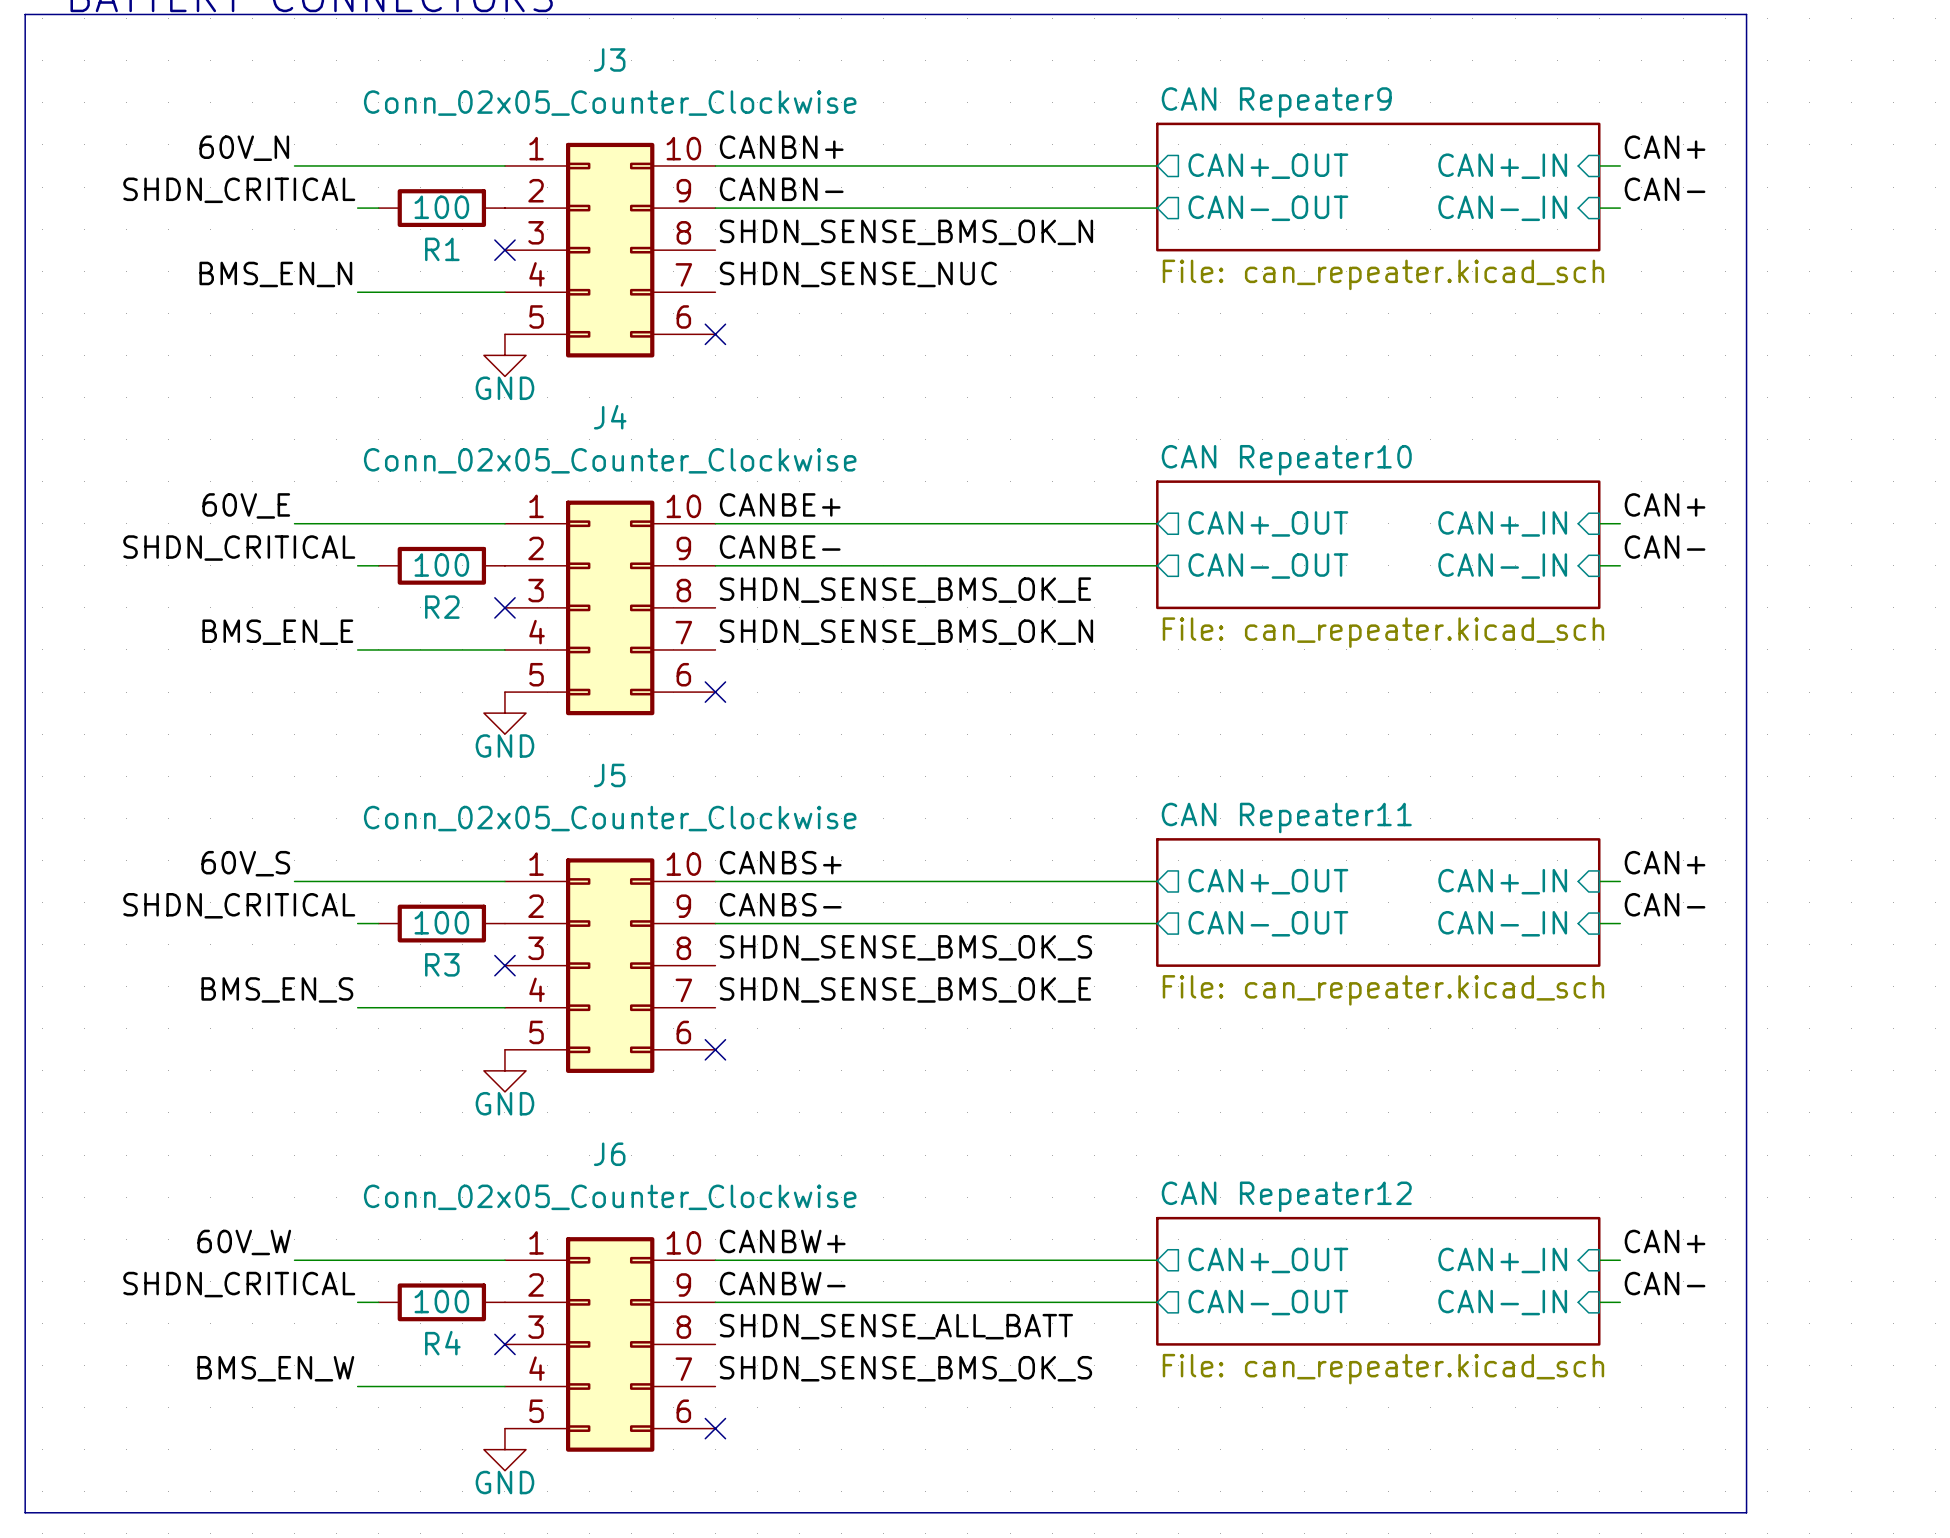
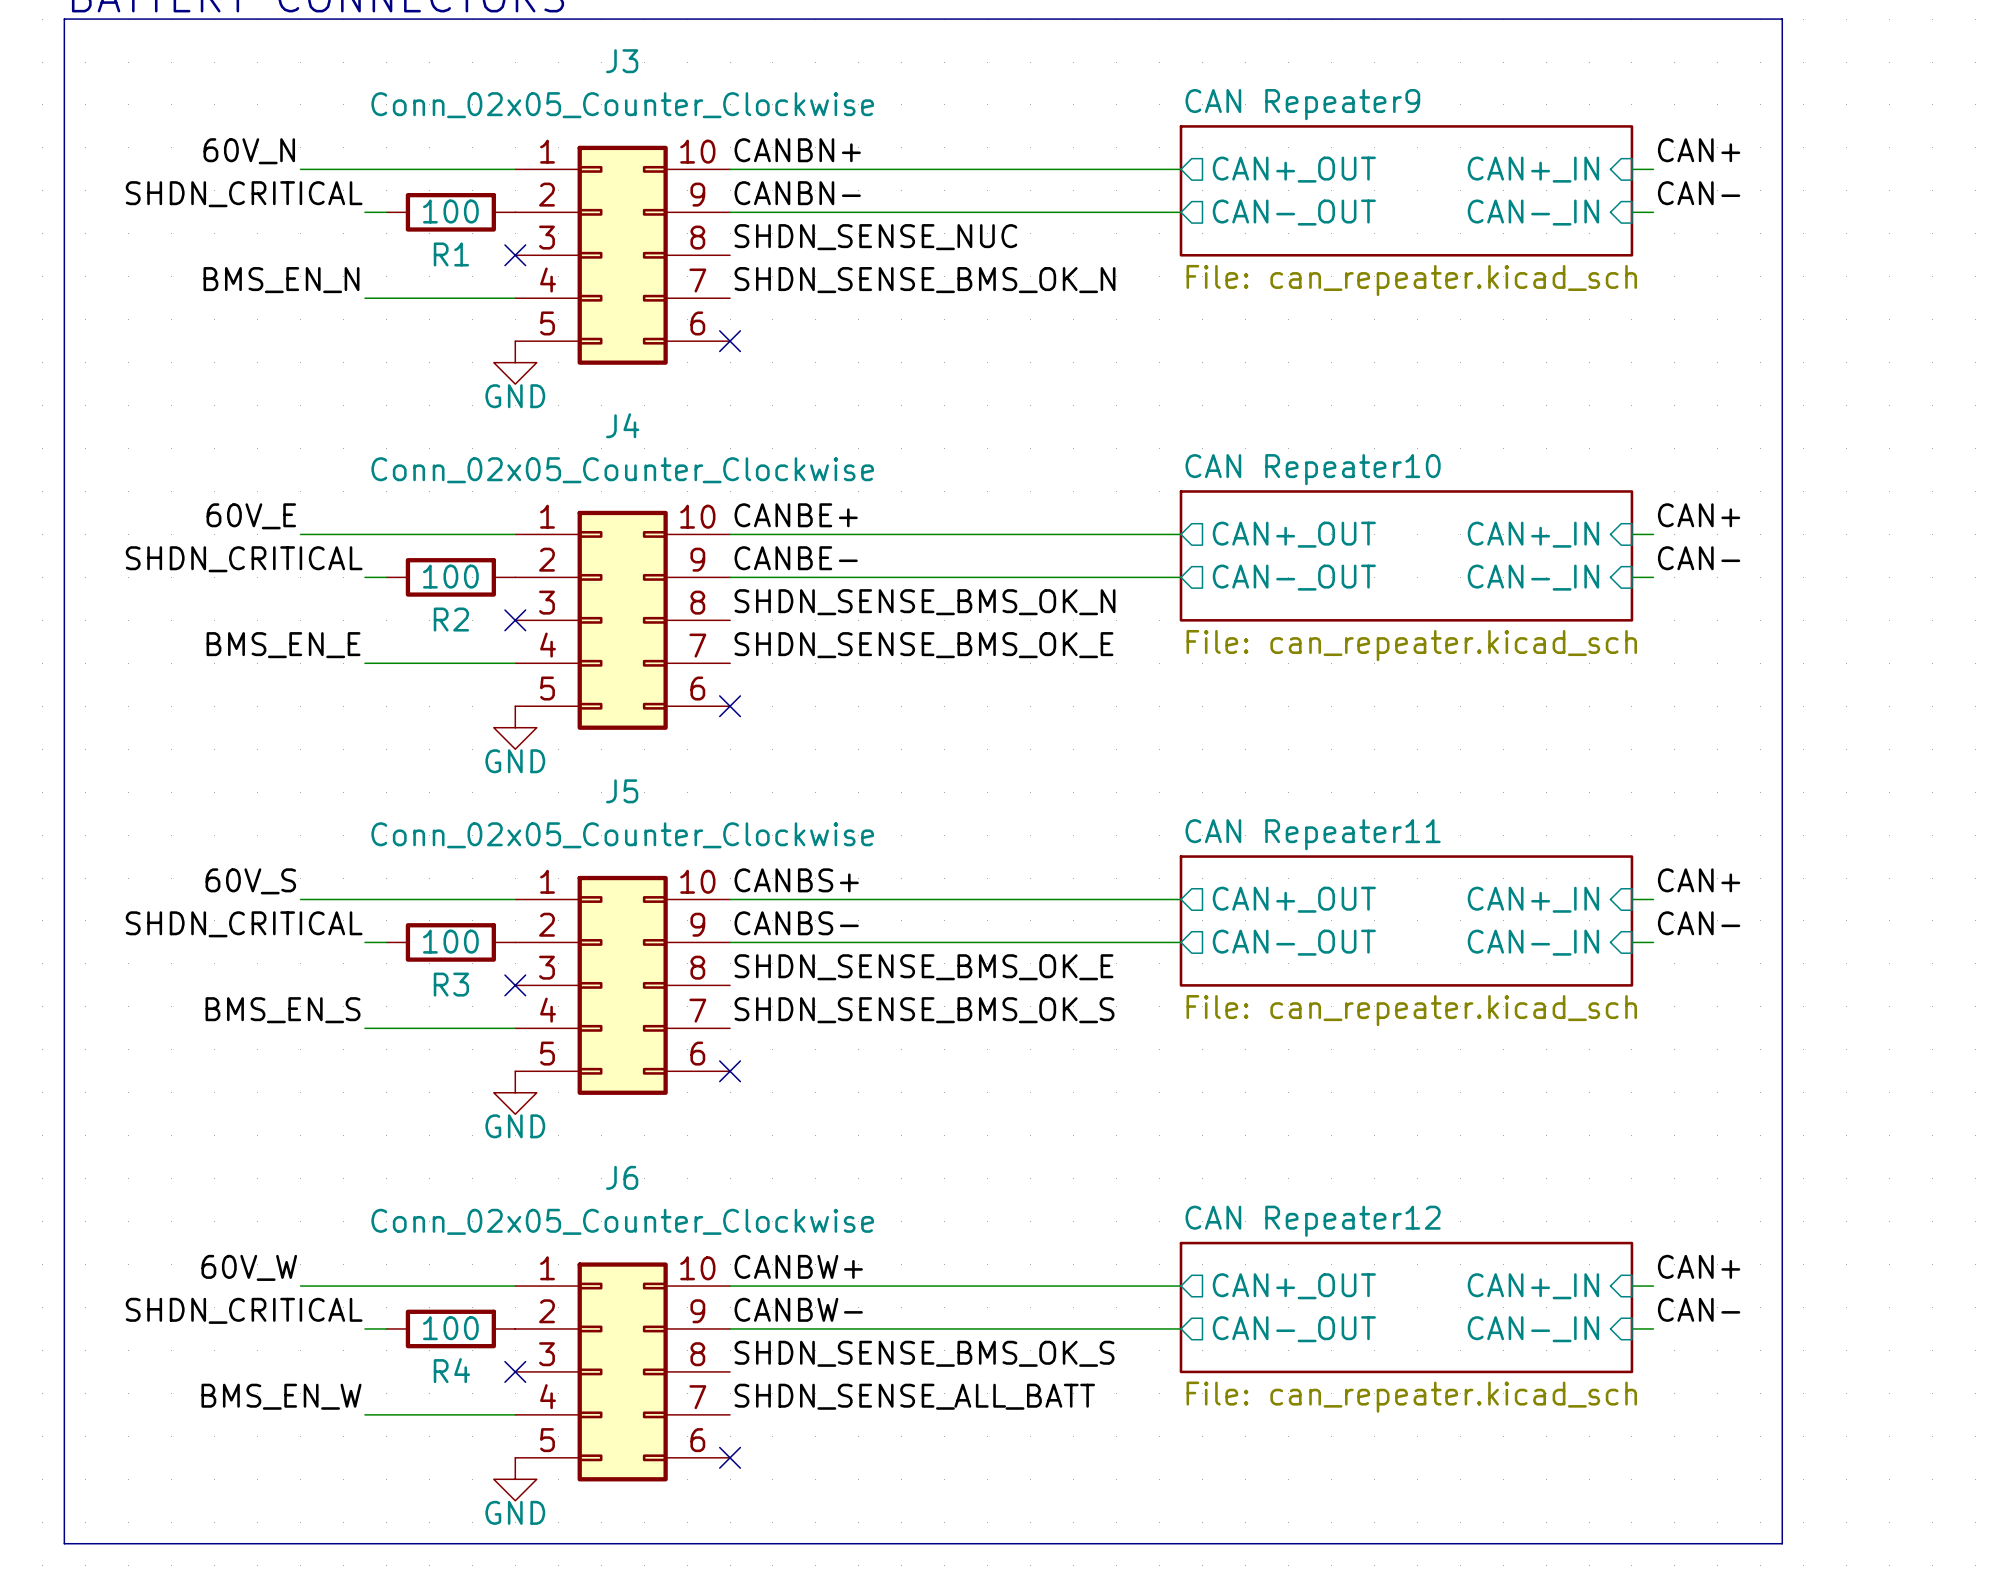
line: (1746, 18) (1746, 14) (25, 14) (25, 1512) (63, 1512) -> (1782, 19) (64, 19) (64, 1543)
label: SHDN_SENSE_BMS_OK_N (906, 232) -> SHDN_SENSE_NUC (875, 237)
label: SHDN_SENSE_NUC (858, 274) -> SHDN_SENSE_BMS_OK_N (925, 280)
label: SHDN_SENSE_BMS_OK_E (905, 590) -> SHDN_SENSE_BMS_OK_N (925, 602)
label: SHDN_SENSE_BMS_OK_N (906, 632) -> SHDN_SENSE_BMS_OK_E (923, 645)
label: SHDN_SENSE_BMS_OK_S (905, 947) -> SHDN_SENSE_BMS_OK_E (923, 967)
label: SHDN_SENSE_BMS_OK_E (905, 989) -> SHDN_SENSE_BMS_OK_S (924, 1010)
label: SHDN_SENSE_ALL_BATT (896, 1326) -> SHDN_SENSE_BMS_OK_S (924, 1353)
label: SHDN_SENSE_BMS_OK_S (905, 1368) -> SHDN_SENSE_ALL_BATT (914, 1396)

